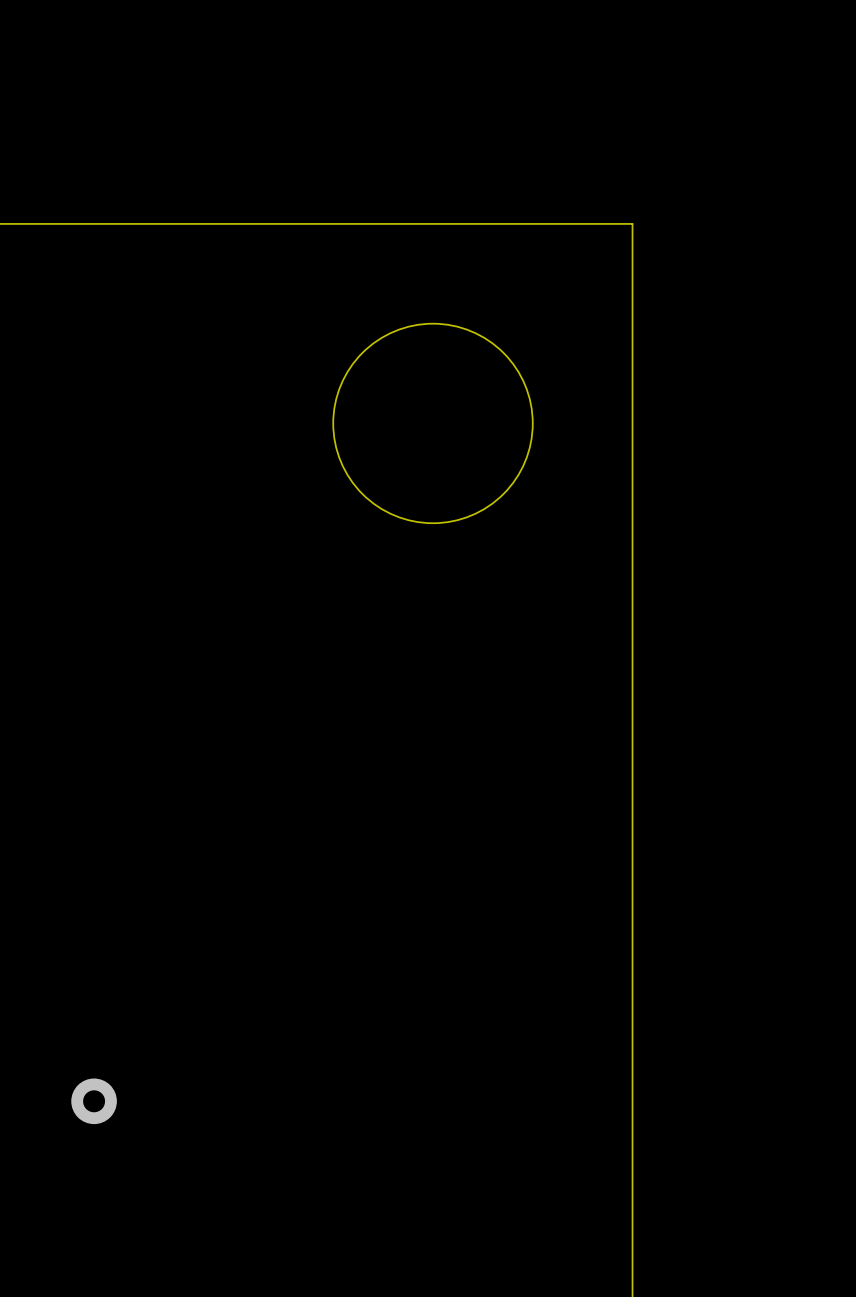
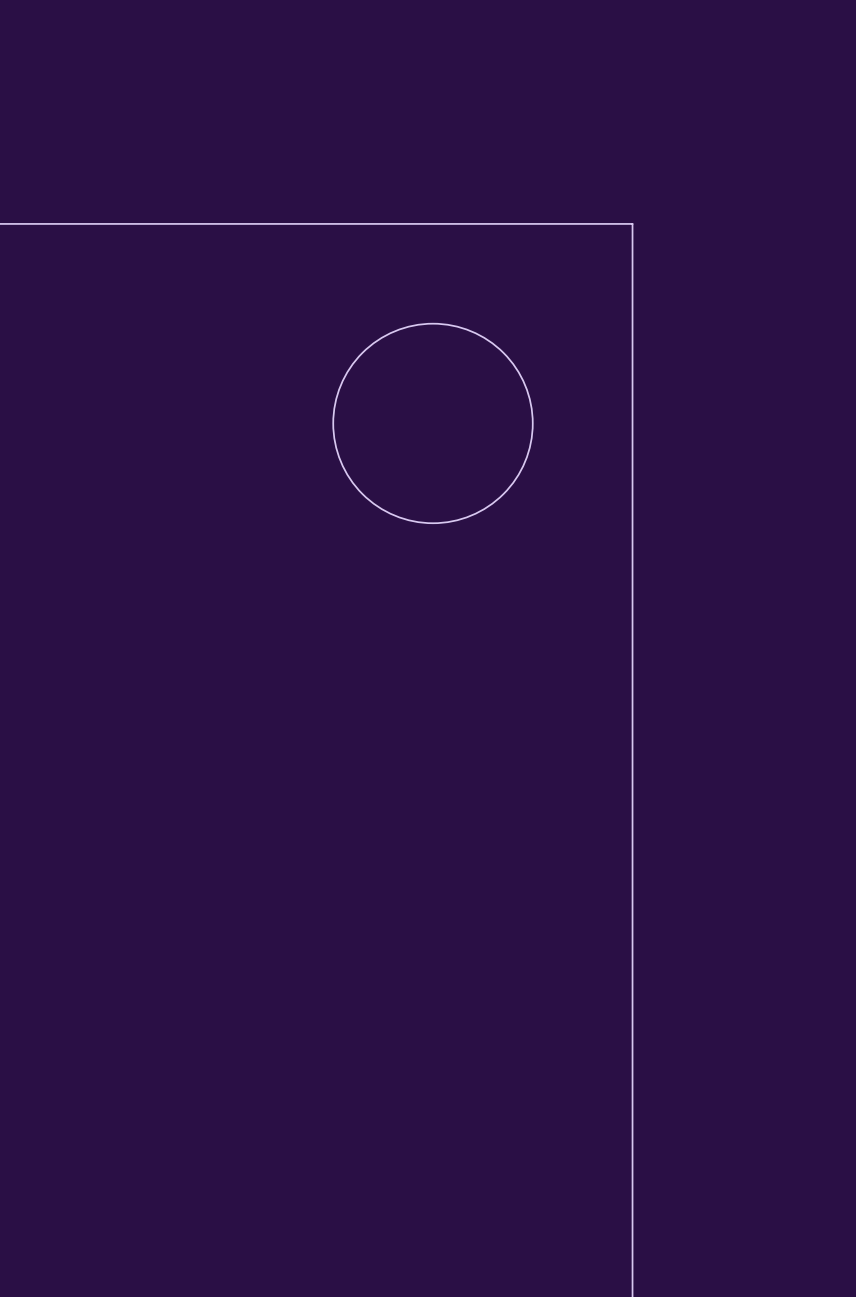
via: (94, 1101) -> none

